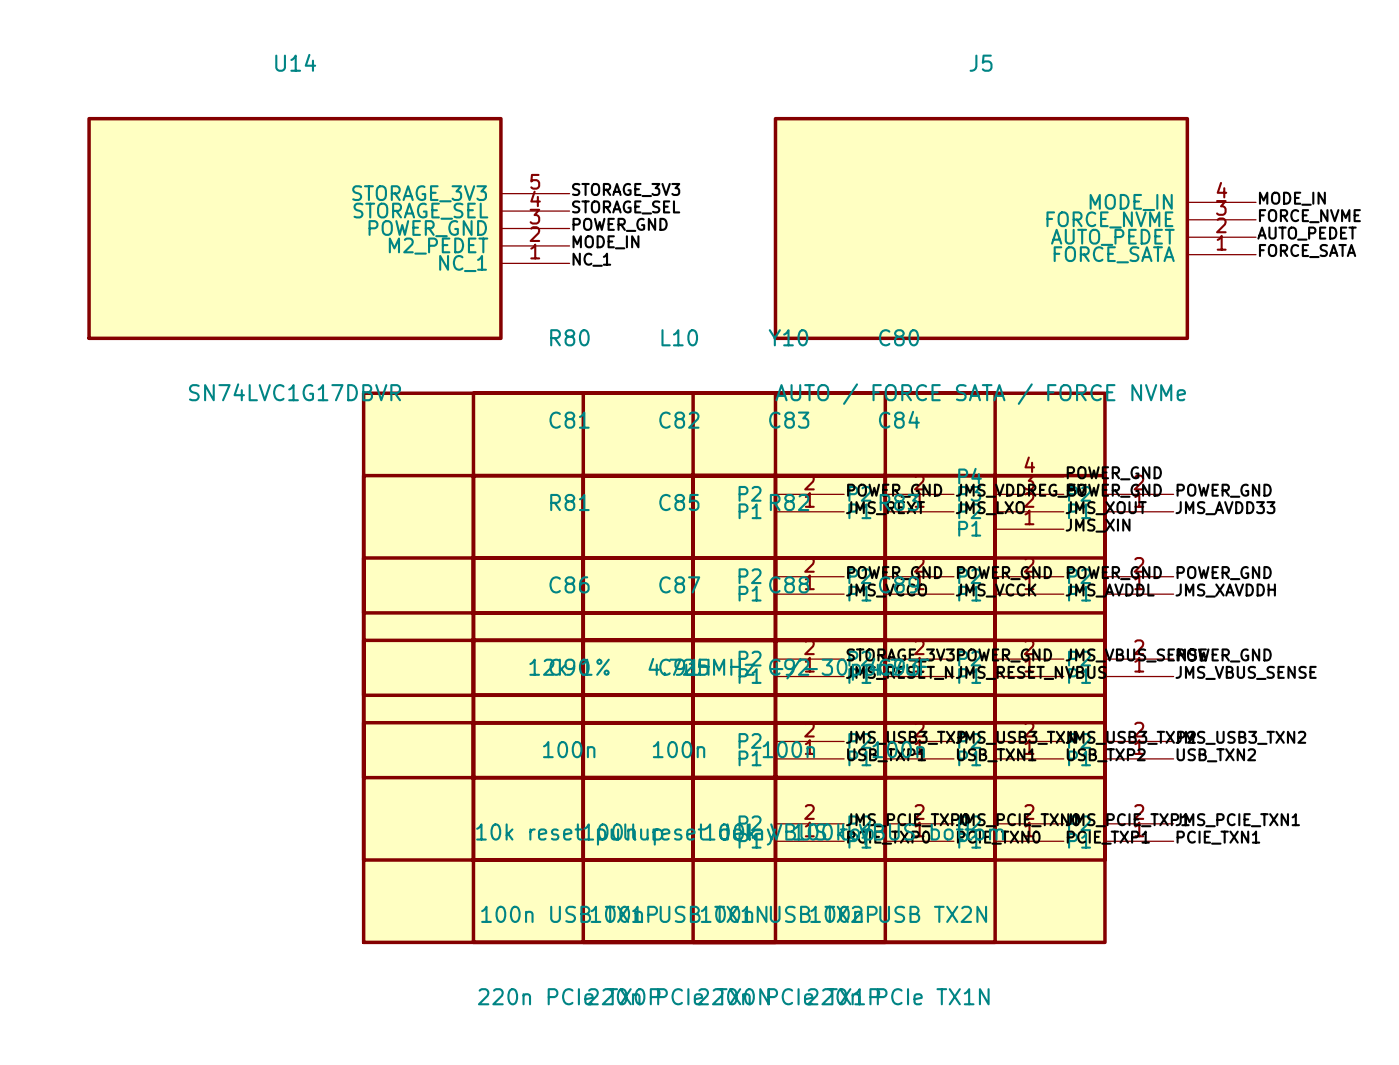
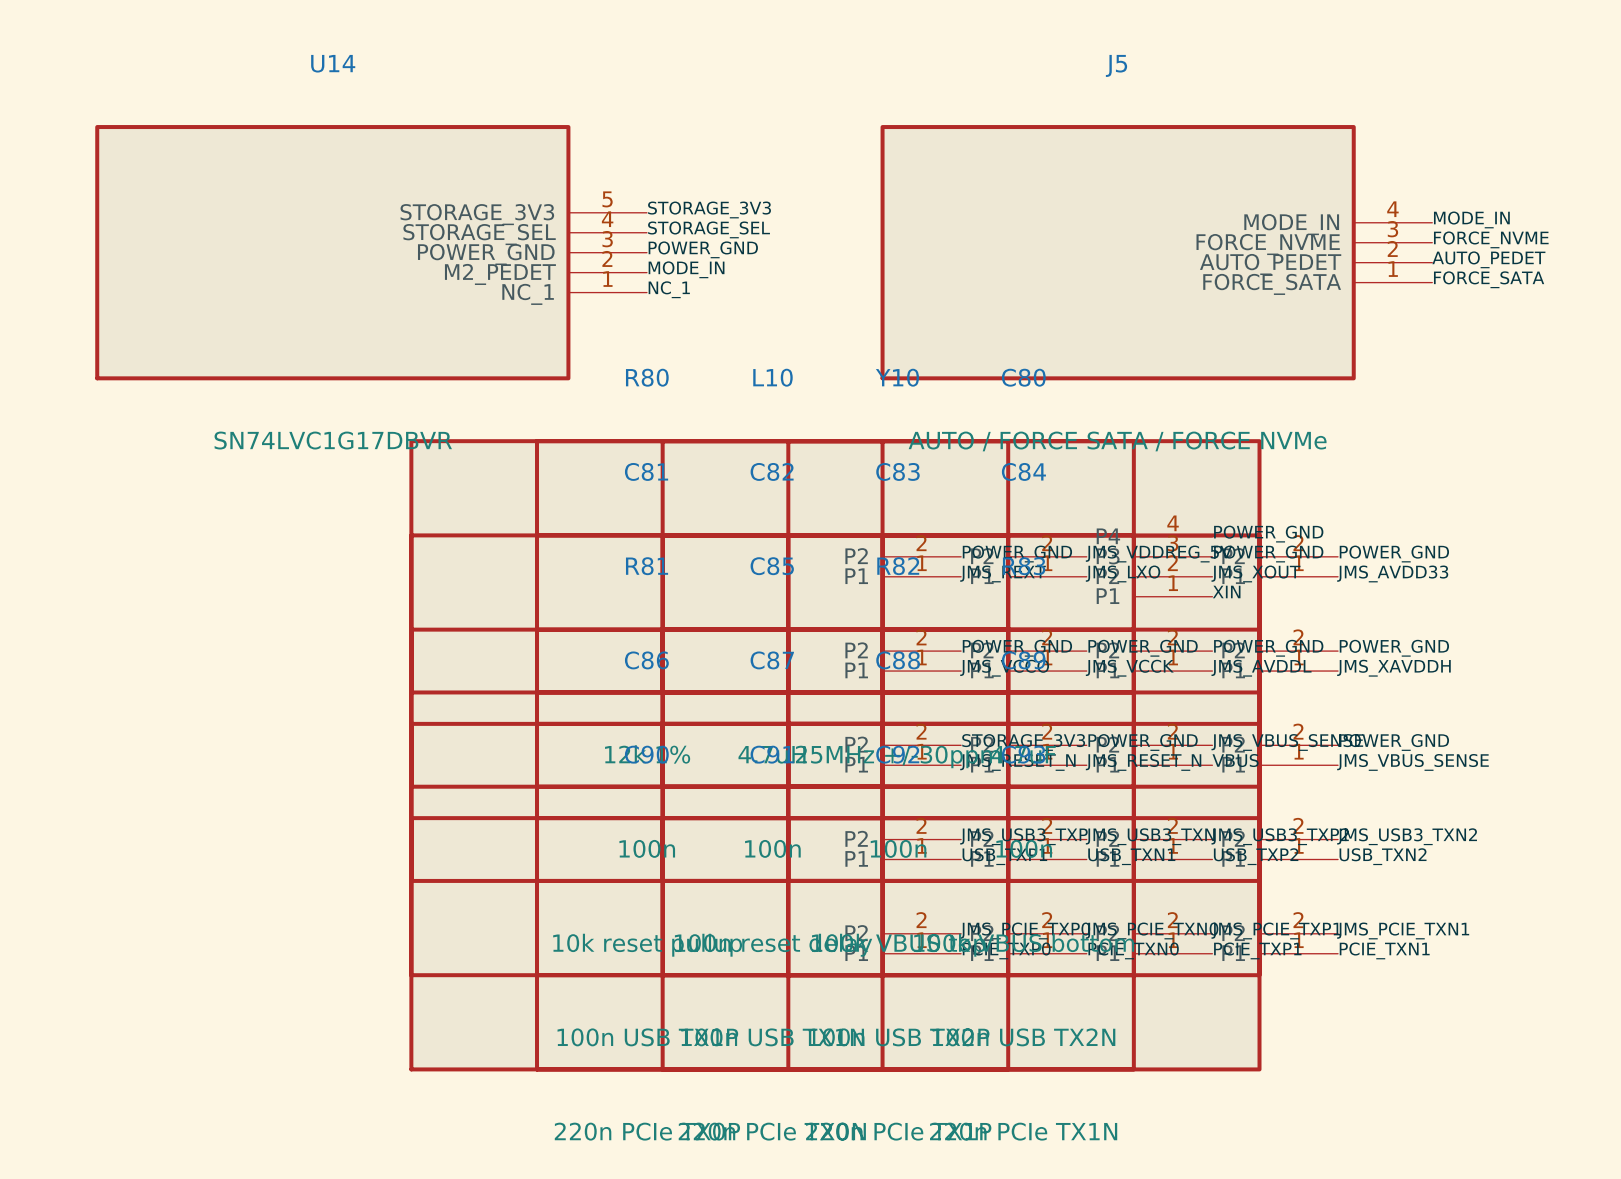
label: JMS_XIN (1098, 525) -> XIN (1226, 591)

